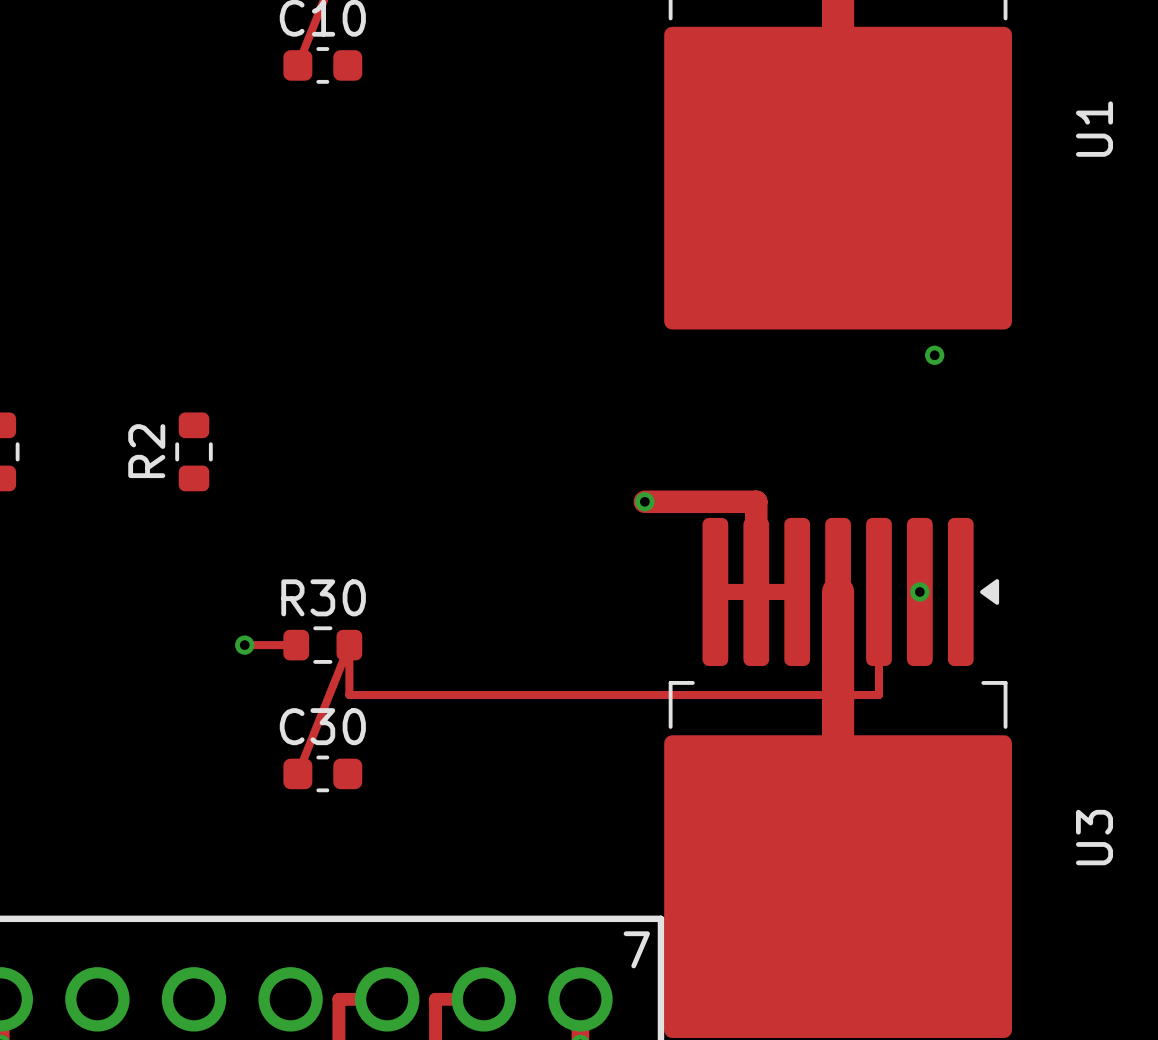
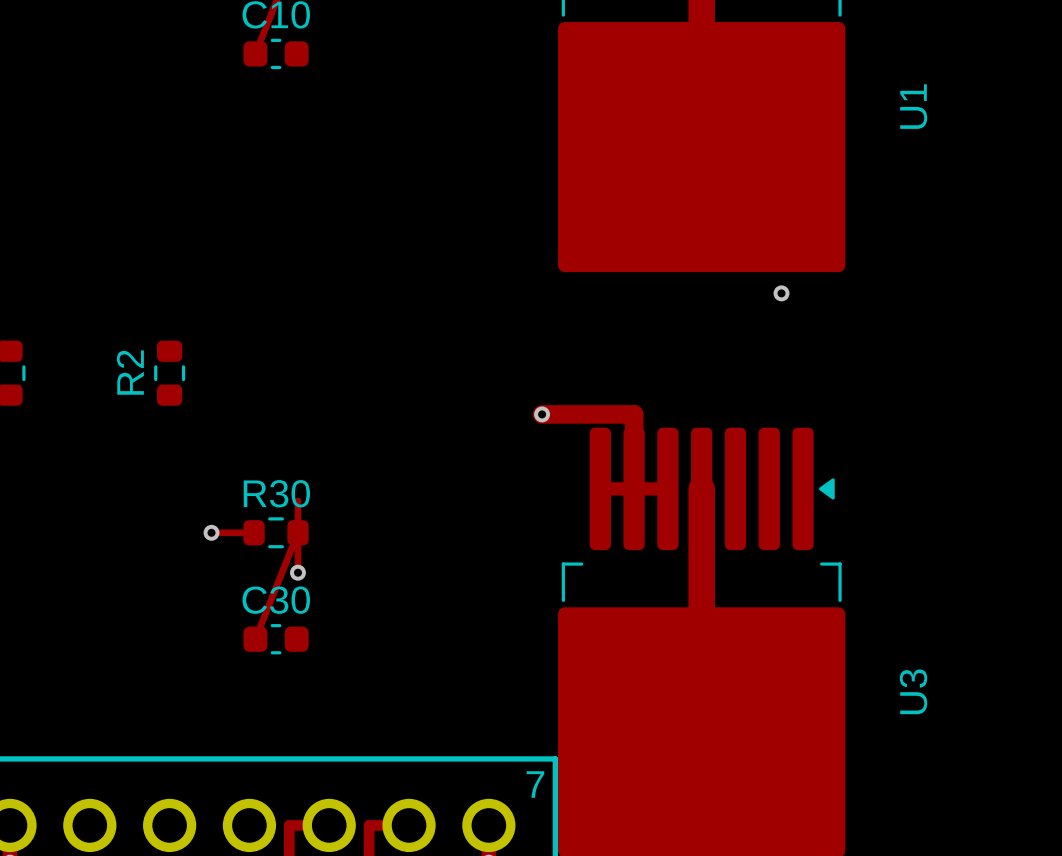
via: (919, 591) -> none
track: none -> (297, 500) (297, 532)
track: (878, 606) (878, 695) (349, 695) (349, 693) -> none
via: none -> (297, 572)

